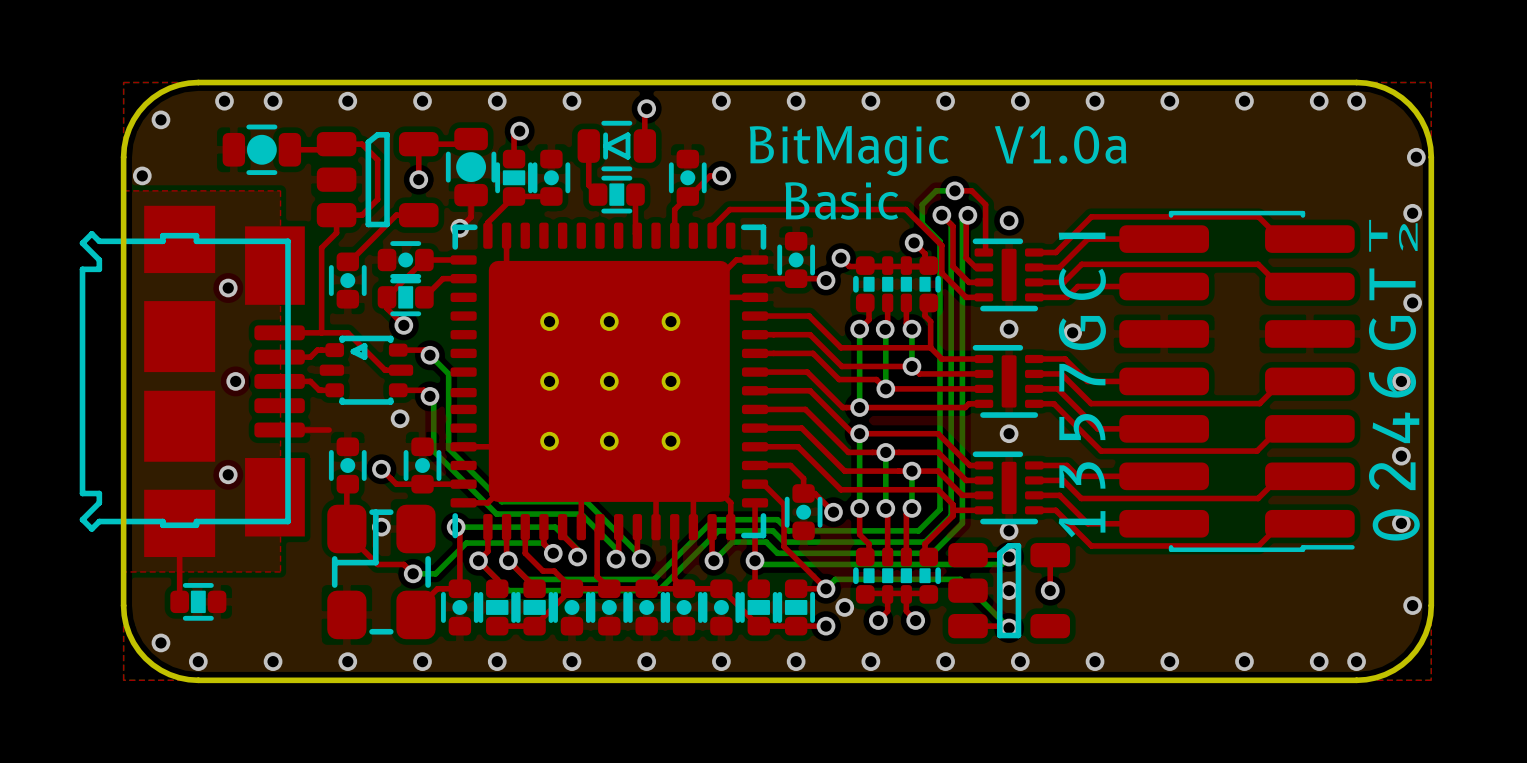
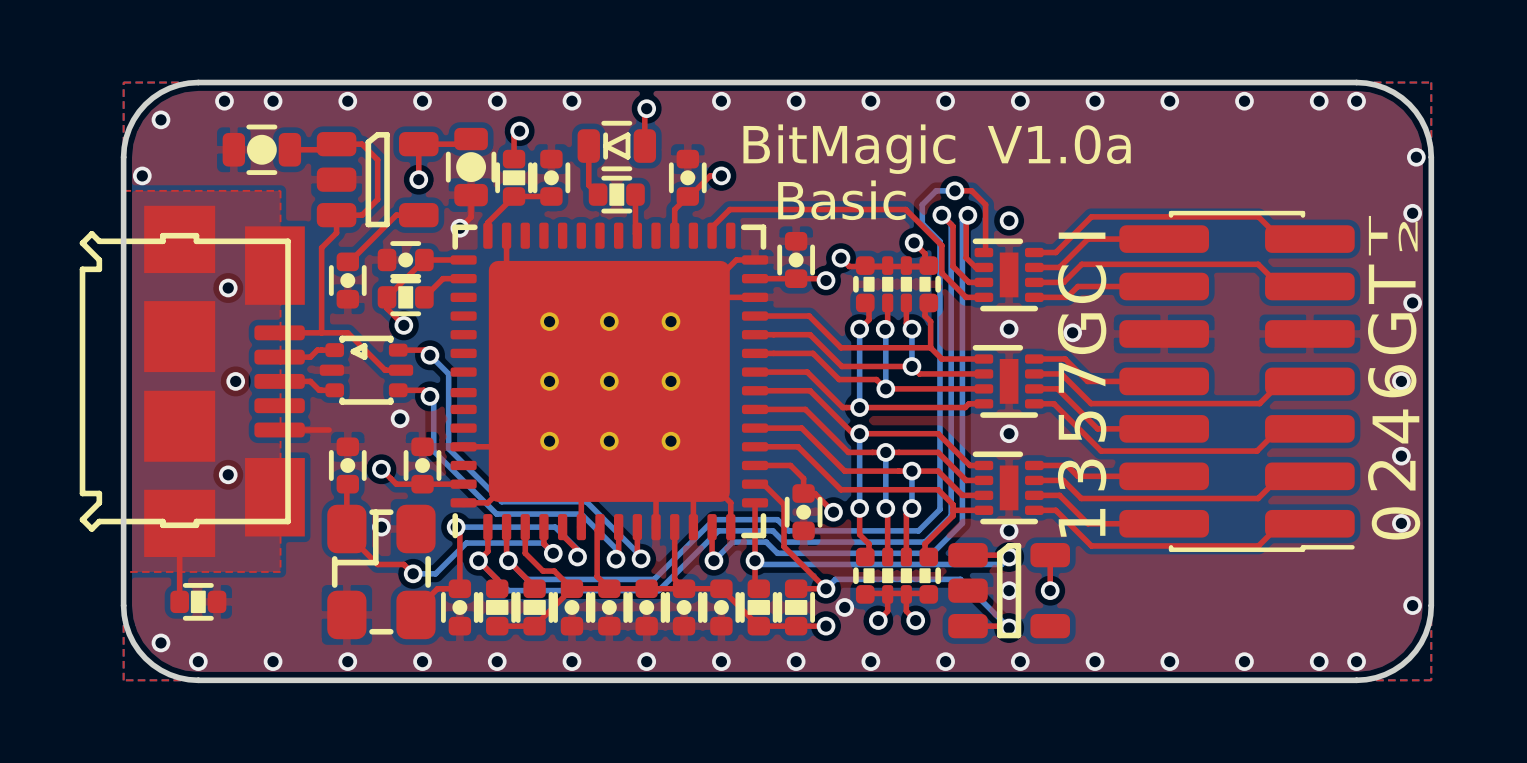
part footprint: [972, 238, 1044, 312] -> [972, 238, 1044, 312]
part footprint: [972, 344, 1044, 418] -> [972, 344, 1044, 418]
part footprint: [972, 451, 1044, 525] -> [972, 451, 1044, 525]

